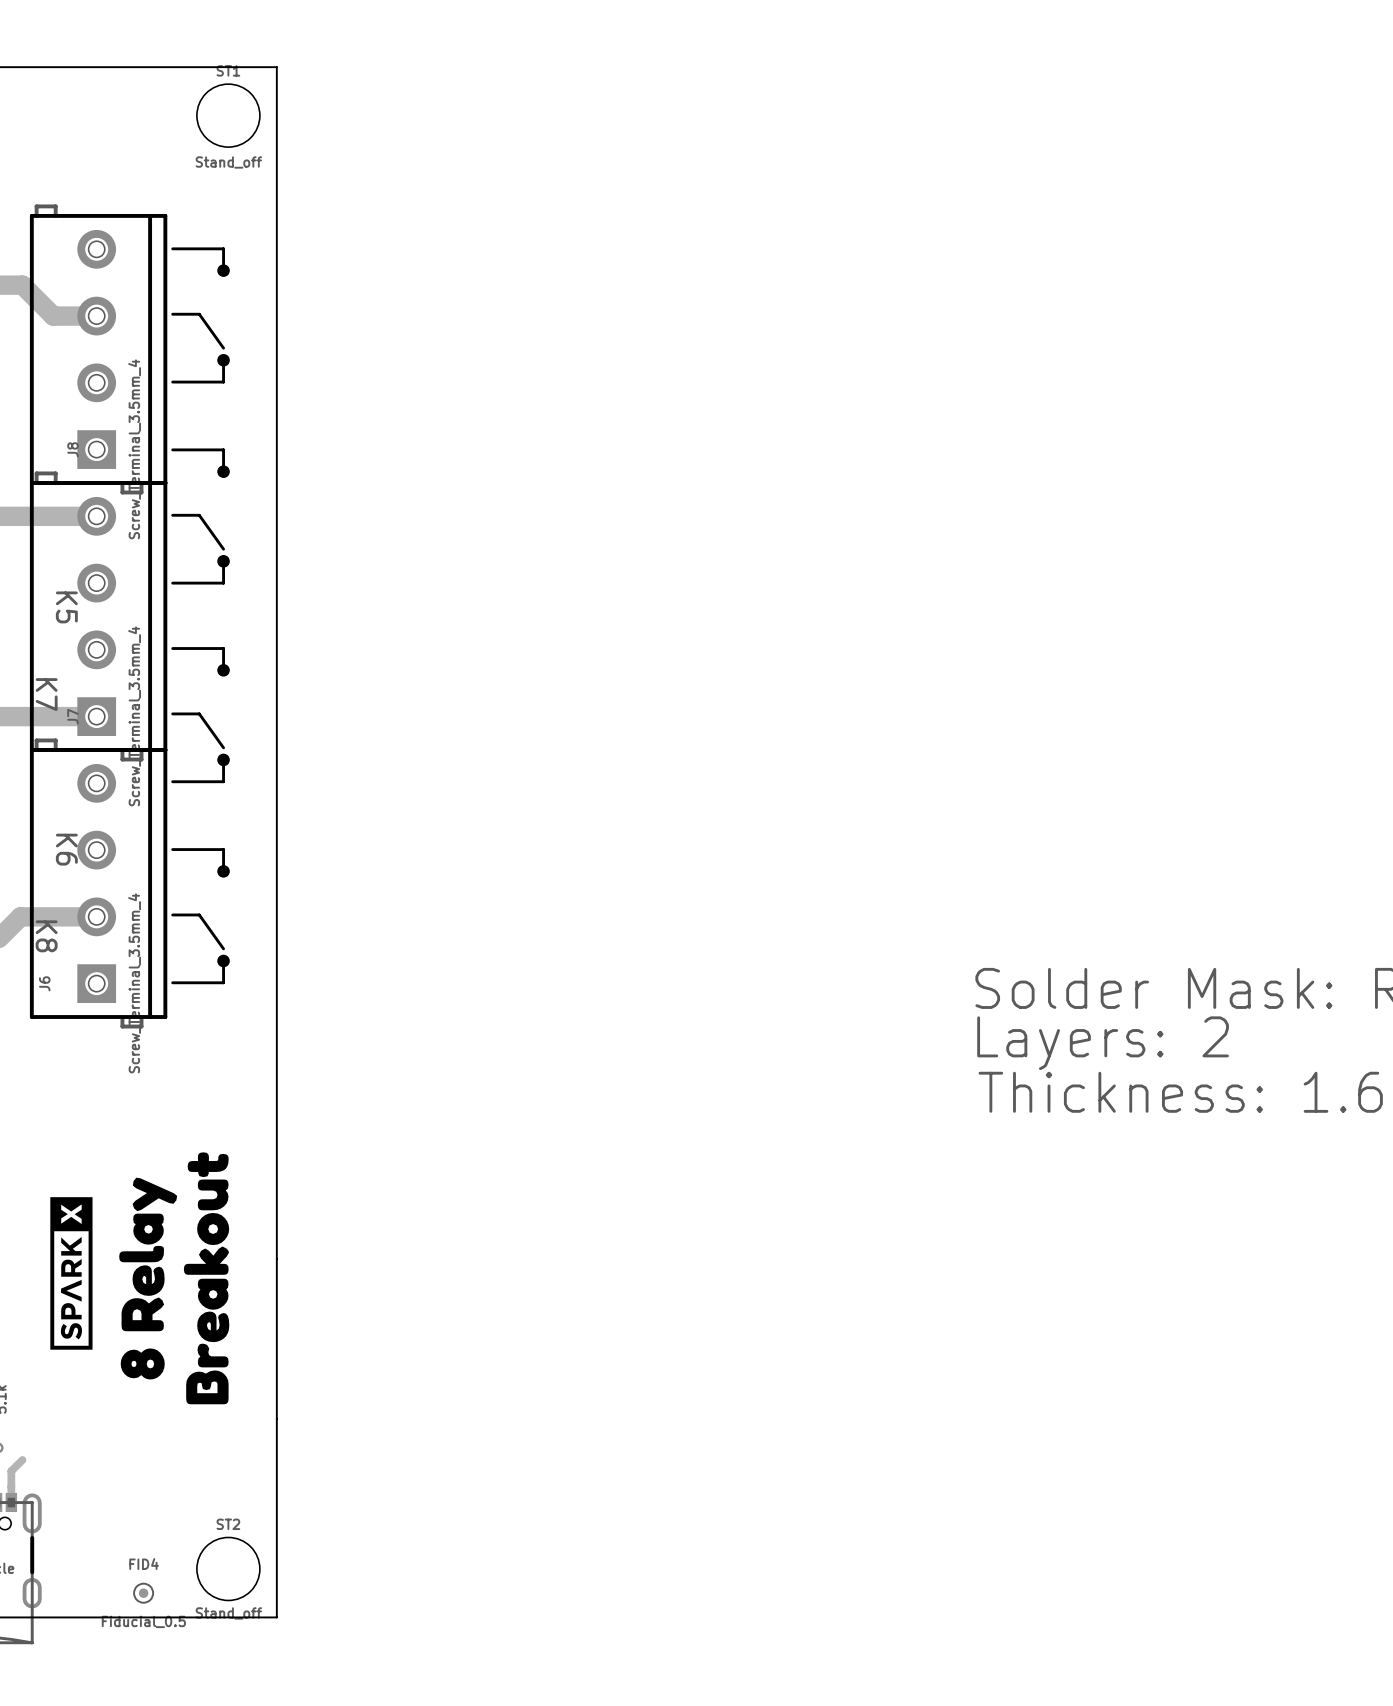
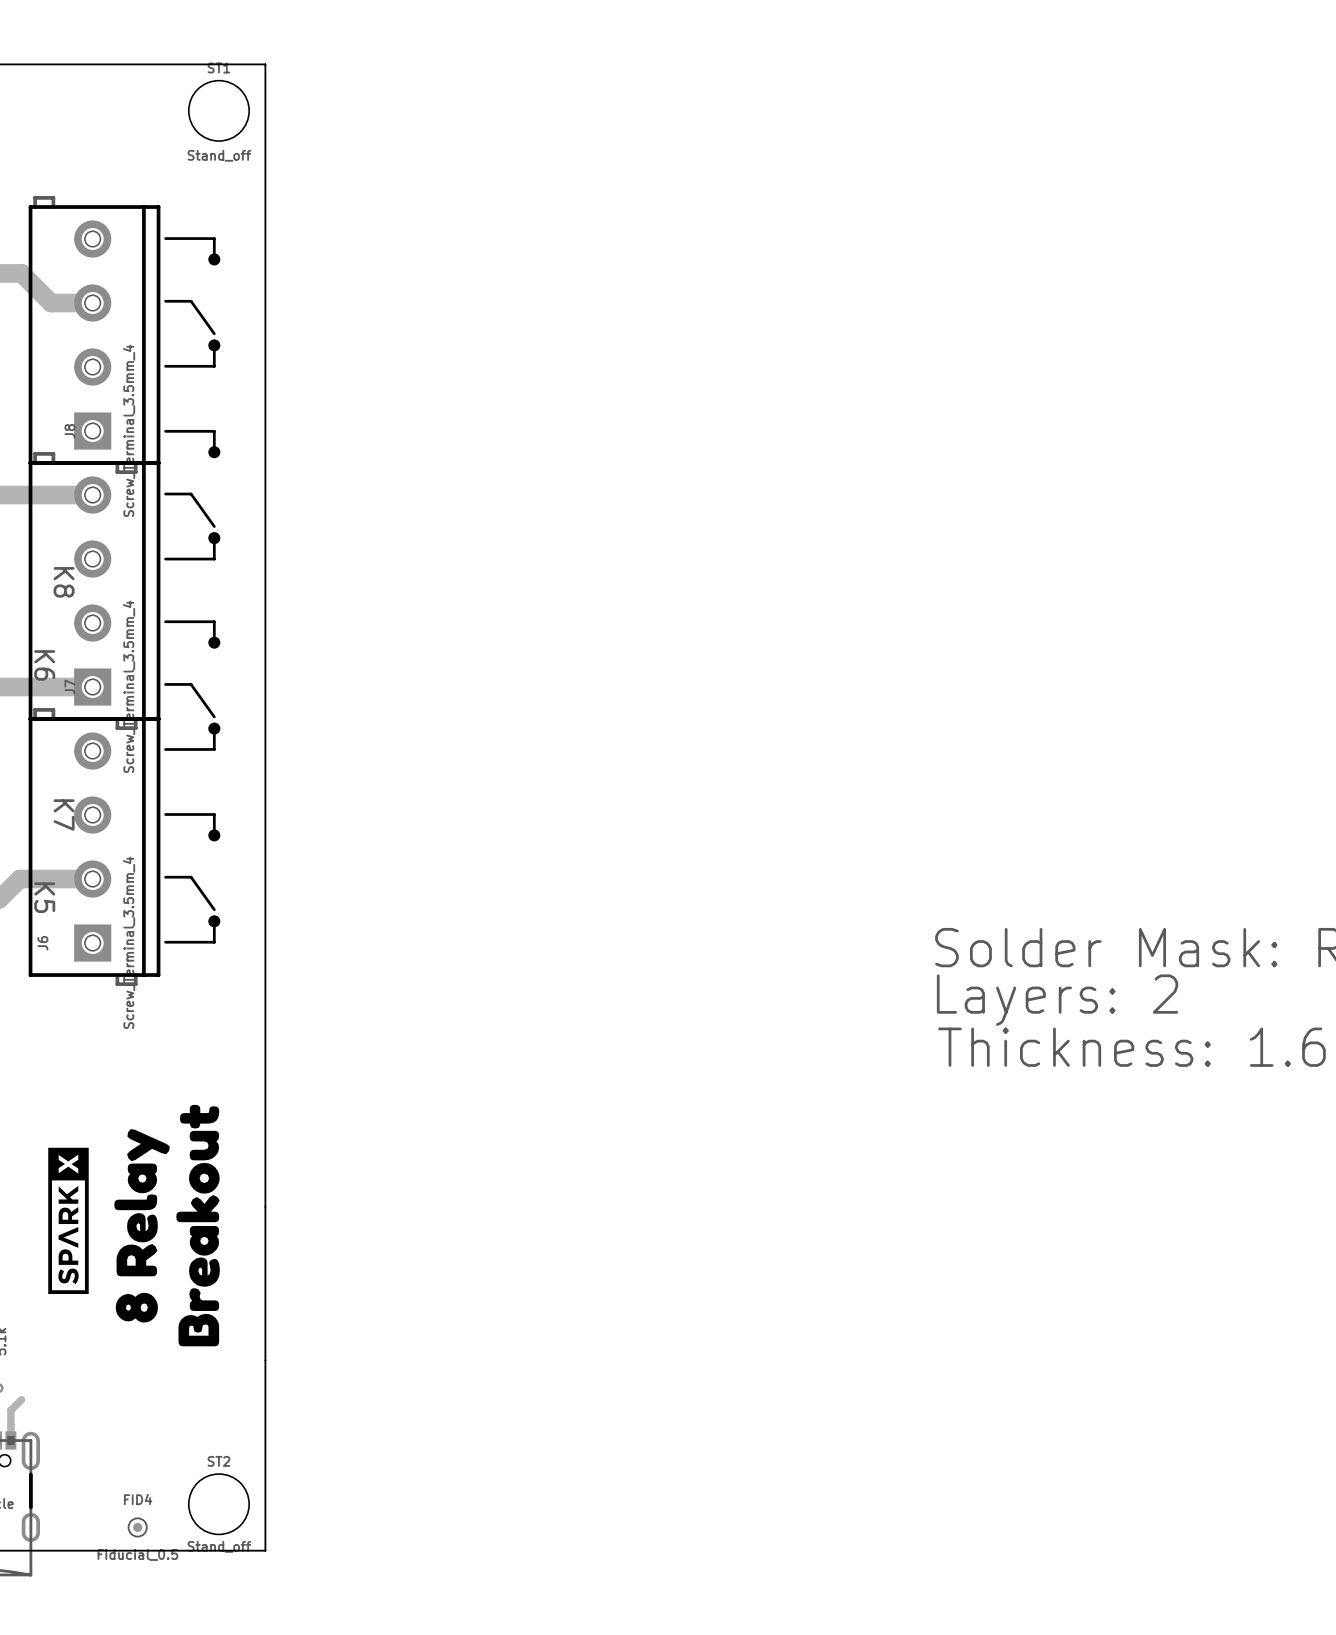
K5 name: K5 (66, 607) -> K8 (64, 582)
K7 name: K7 (46, 694) -> K6 (44, 665)
K6 name: K6 (66, 849) -> K7 (64, 815)
K8 name: K8 (46, 936) -> K5 (44, 897)

